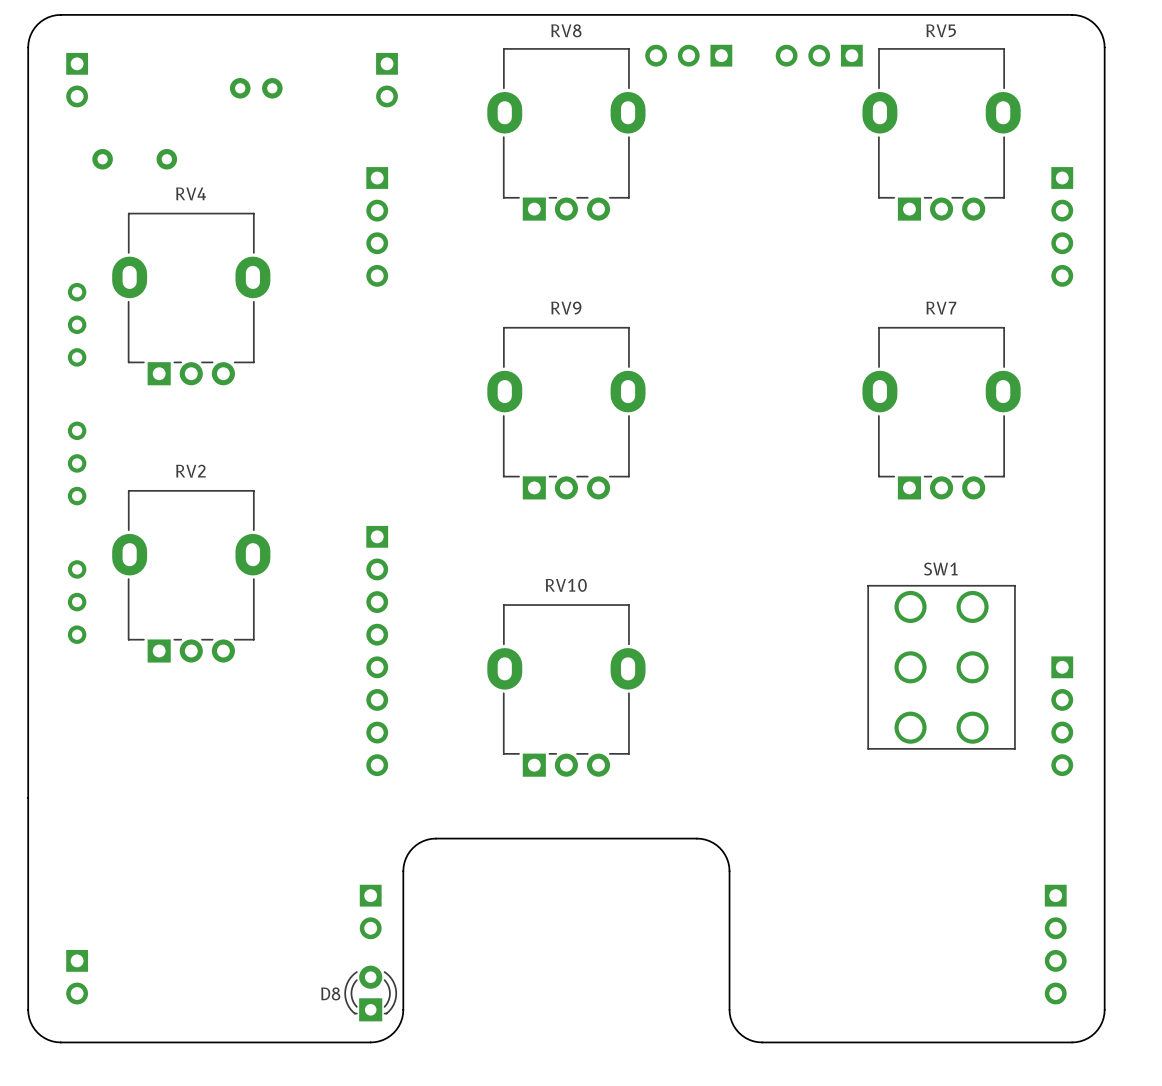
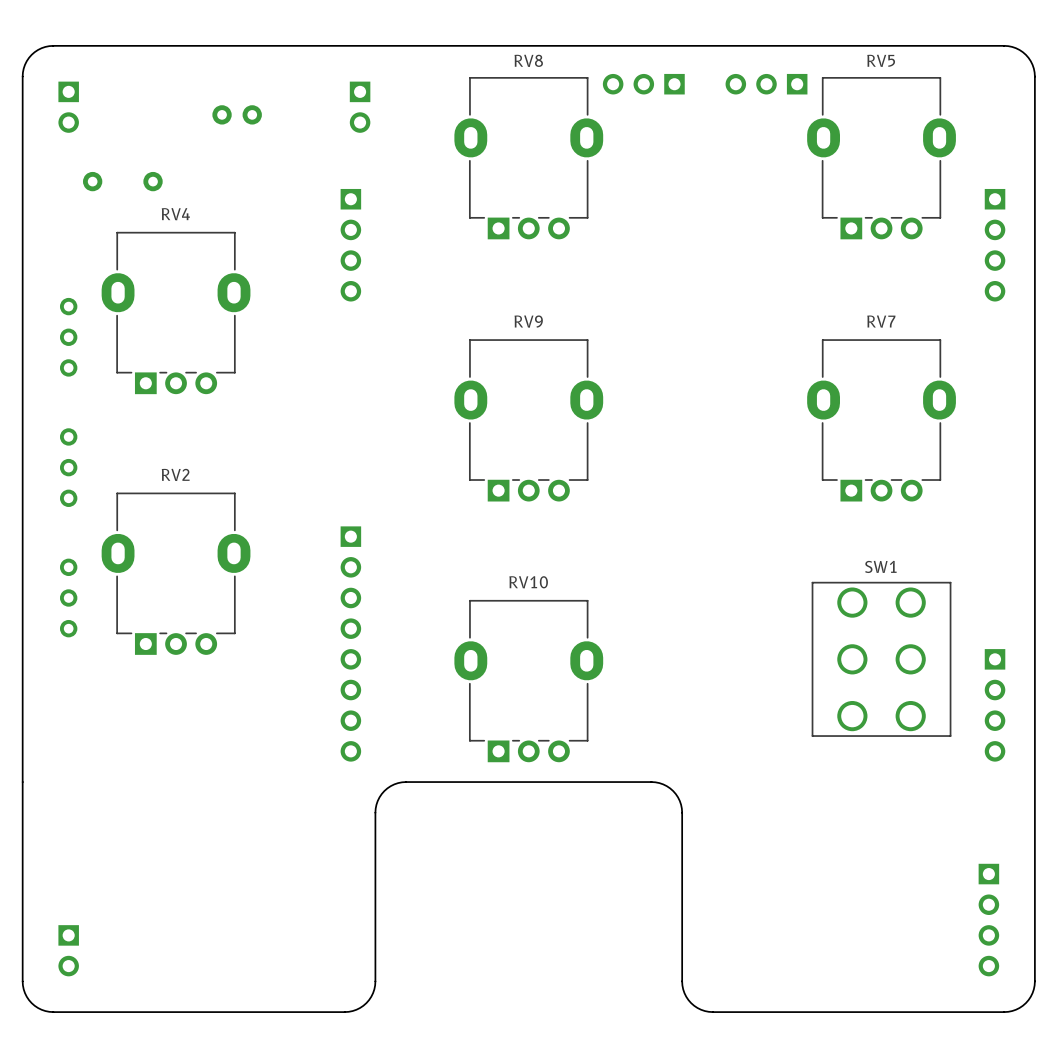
board edge: (729, 871) (727, 858) (719, 848) (709, 841) (696, 838) (431, 838) (419, 842) (410, 851) (405, 858) (403, 871) -> (682, 851) (682, 812) (679, 800) (675, 794) (666, 786) (651, 782) (398, 783) (384, 791) (376, 804) (375, 851)
part: (370, 911) -> none
D8: (370, 993) -> none

